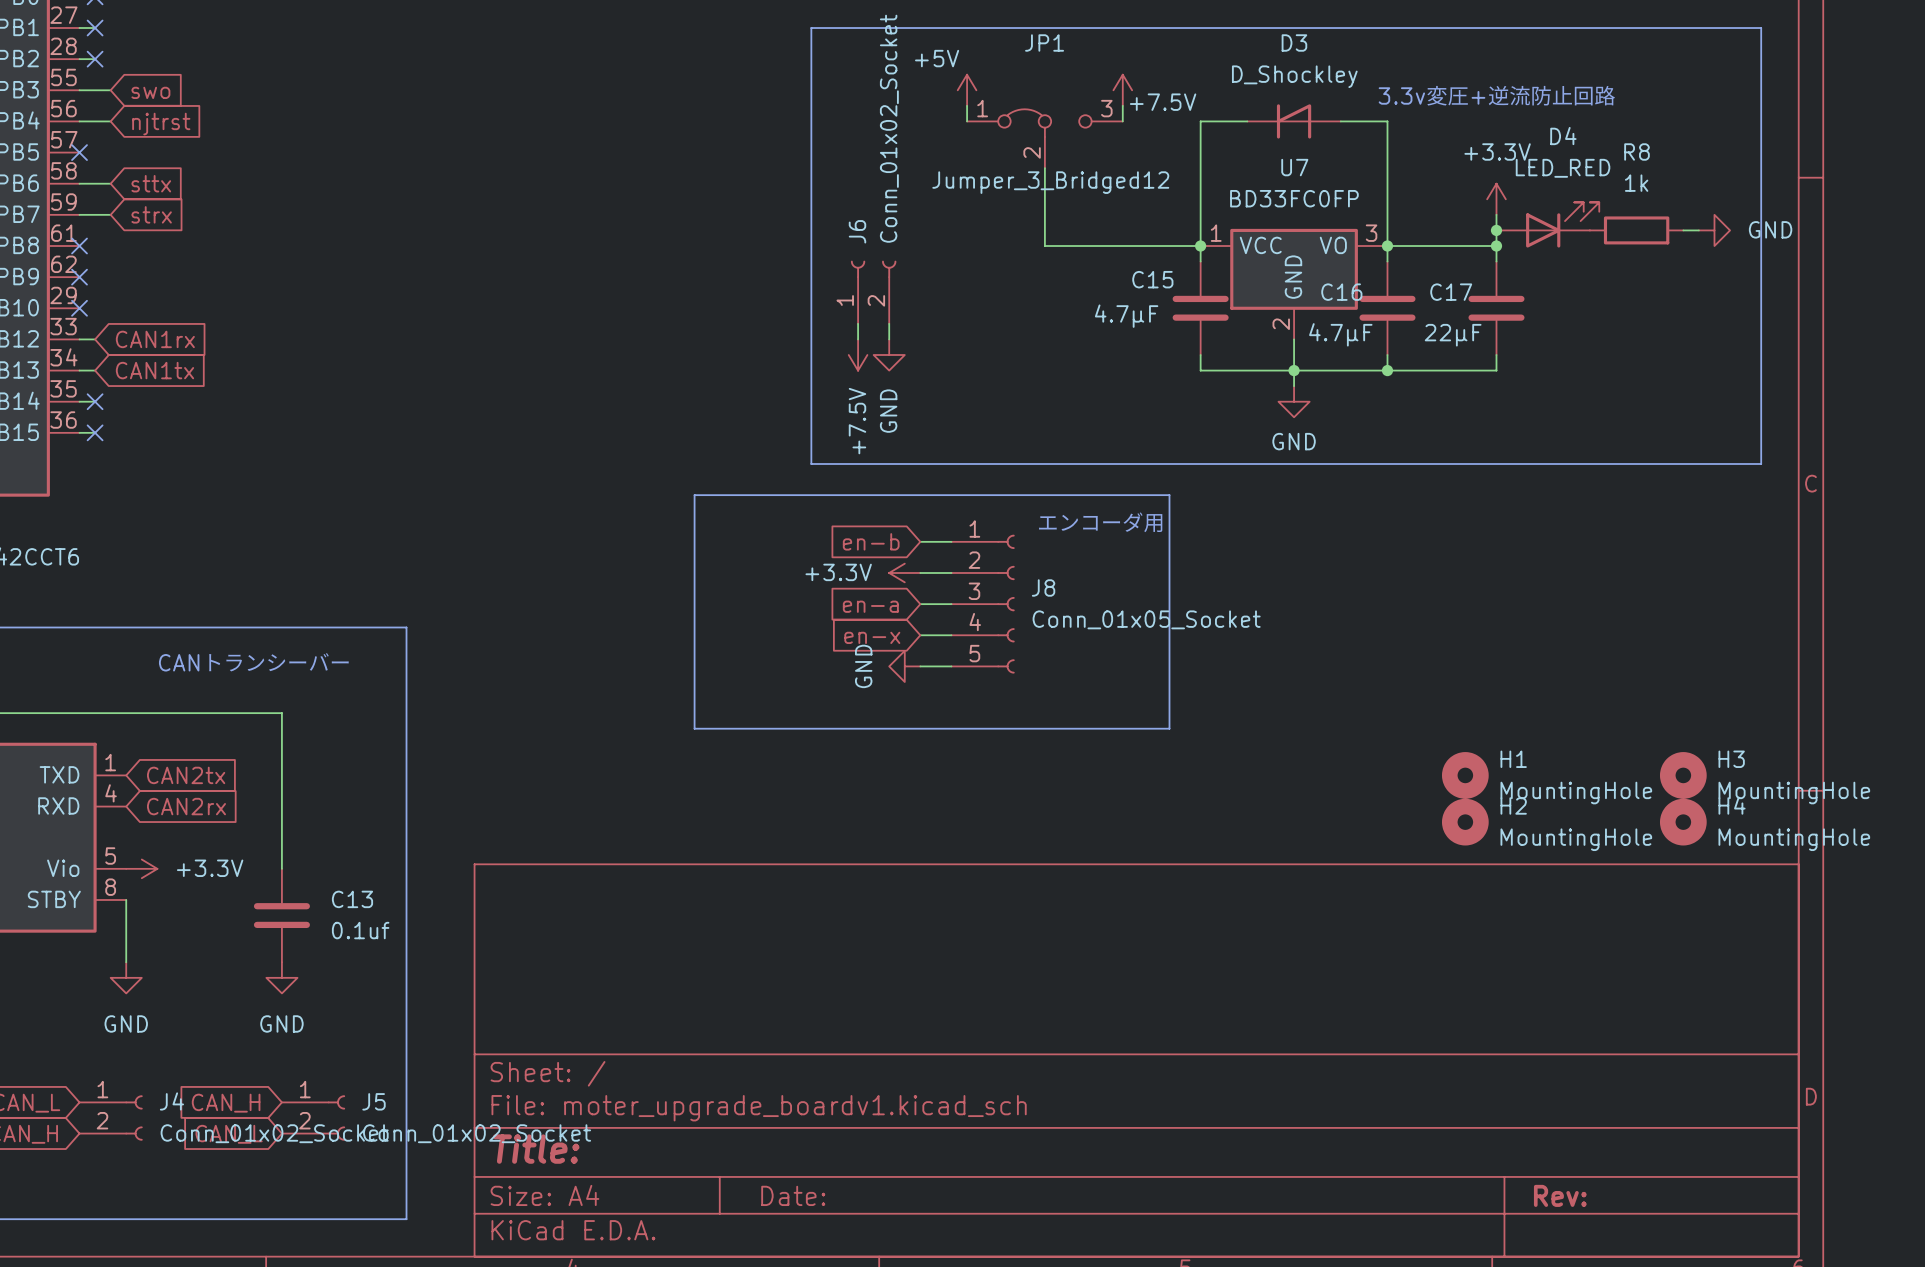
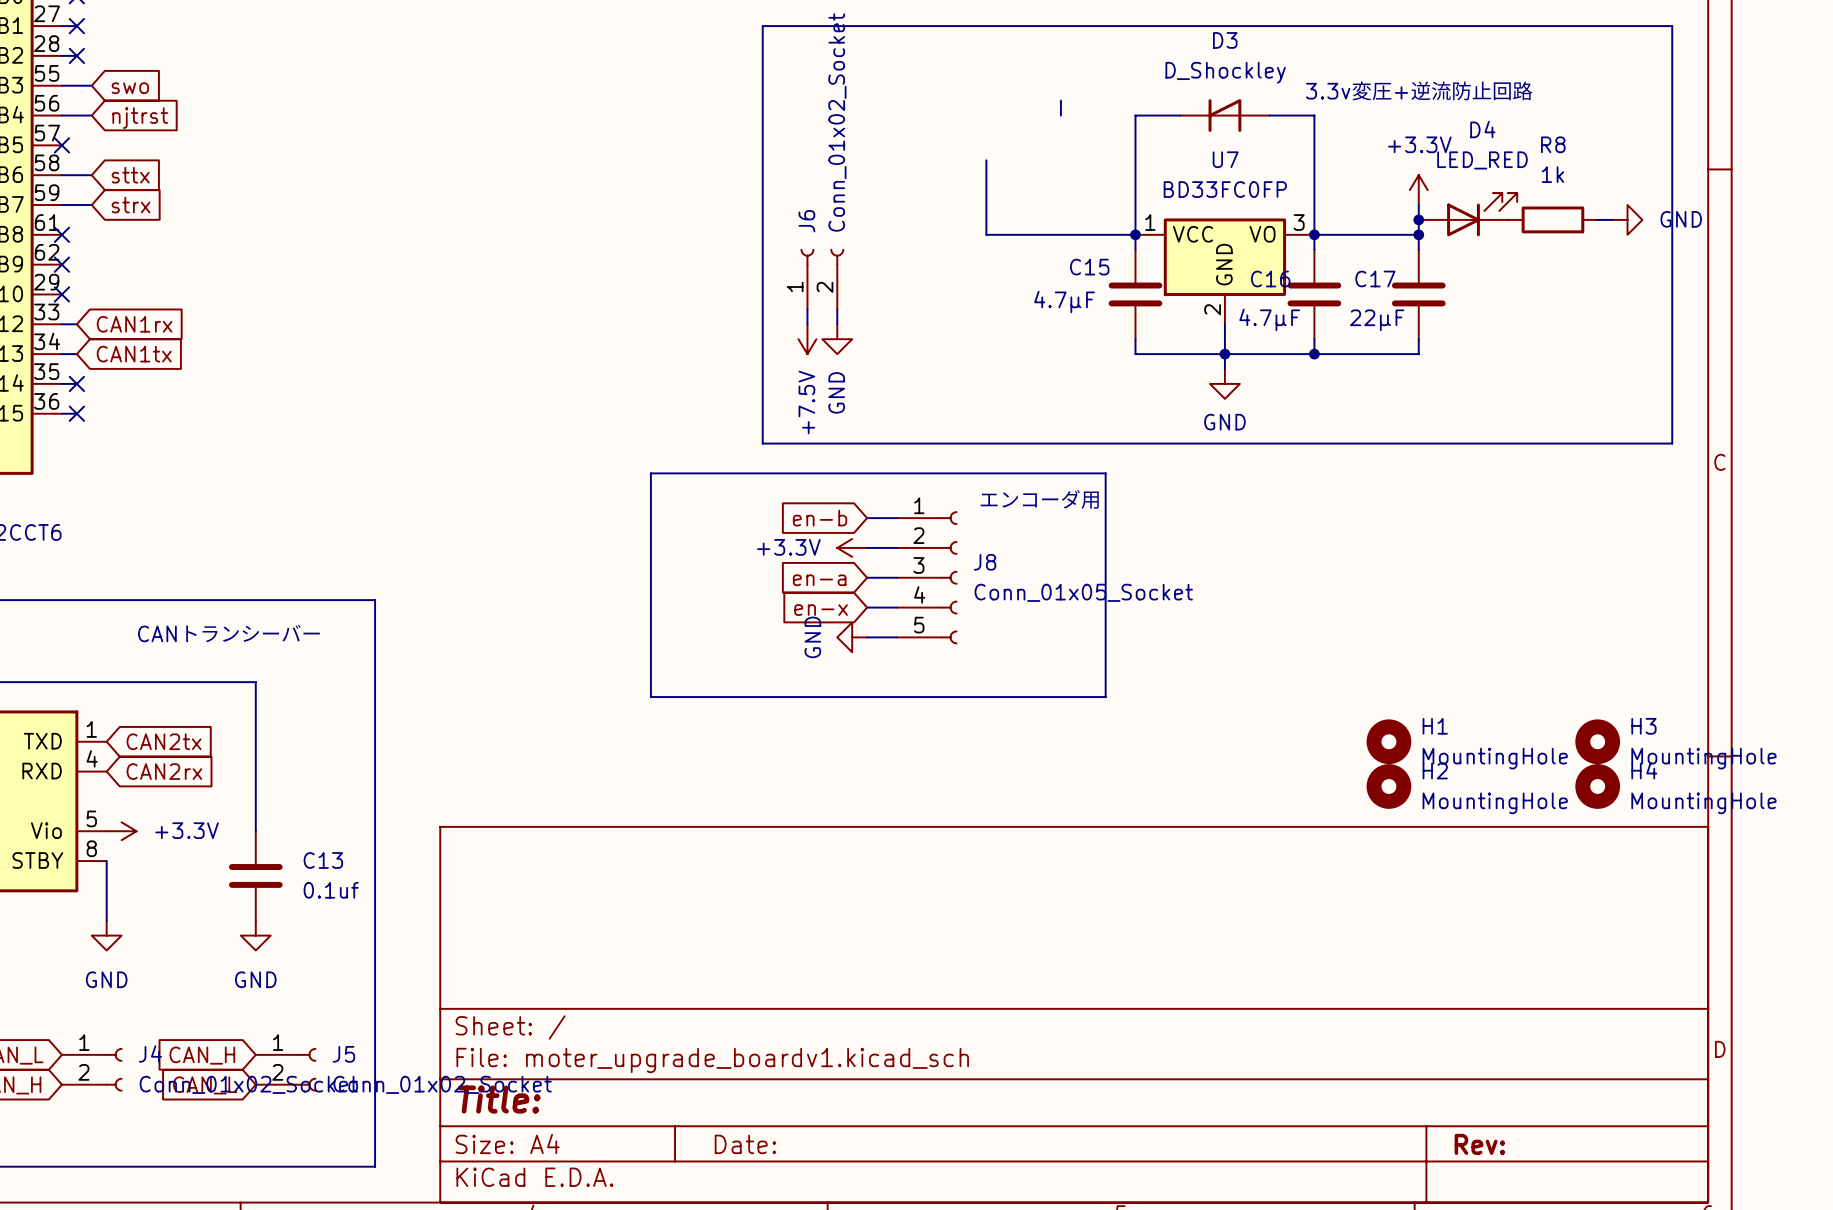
power symbol: +5V (967, 90) -> none
power symbol: +7.5V (1122, 90) -> none
wire: (967, 105) (967, 121) -> none
JP1: Jumper_3_Bridged12 (1044, 138) -> none

